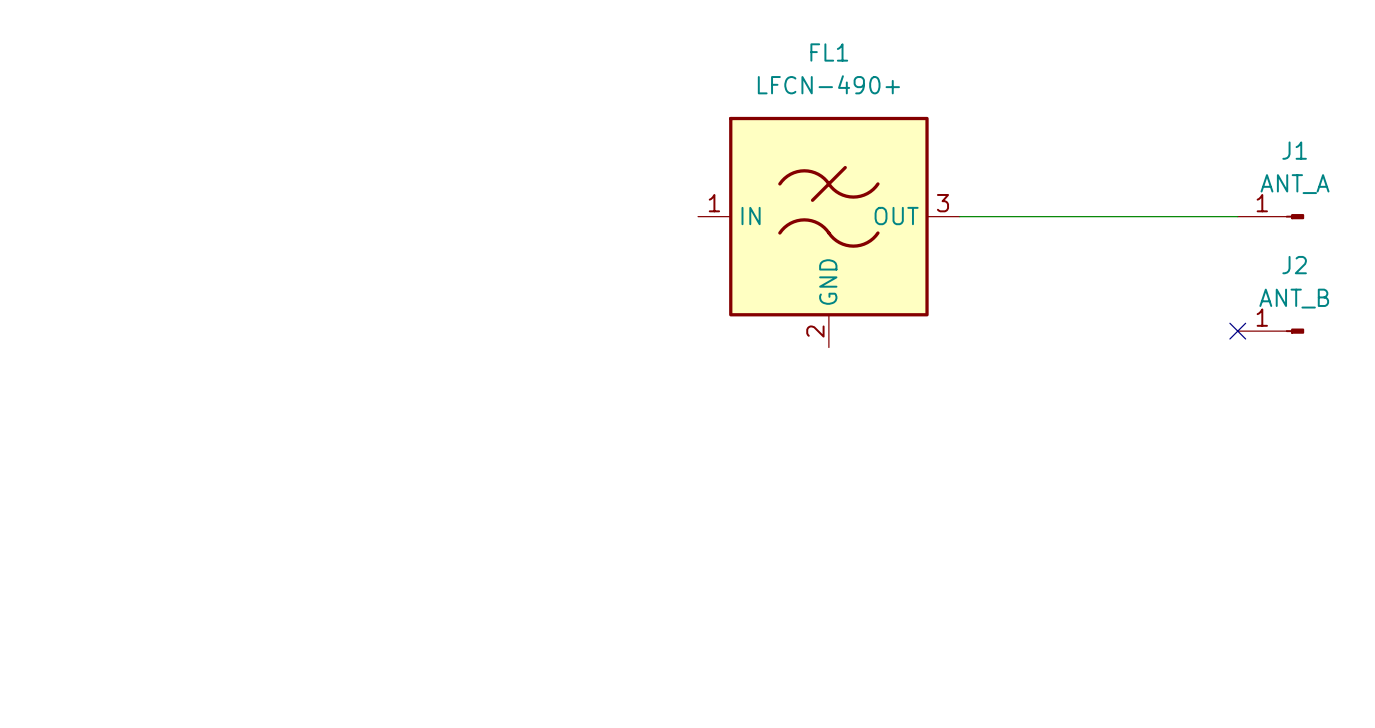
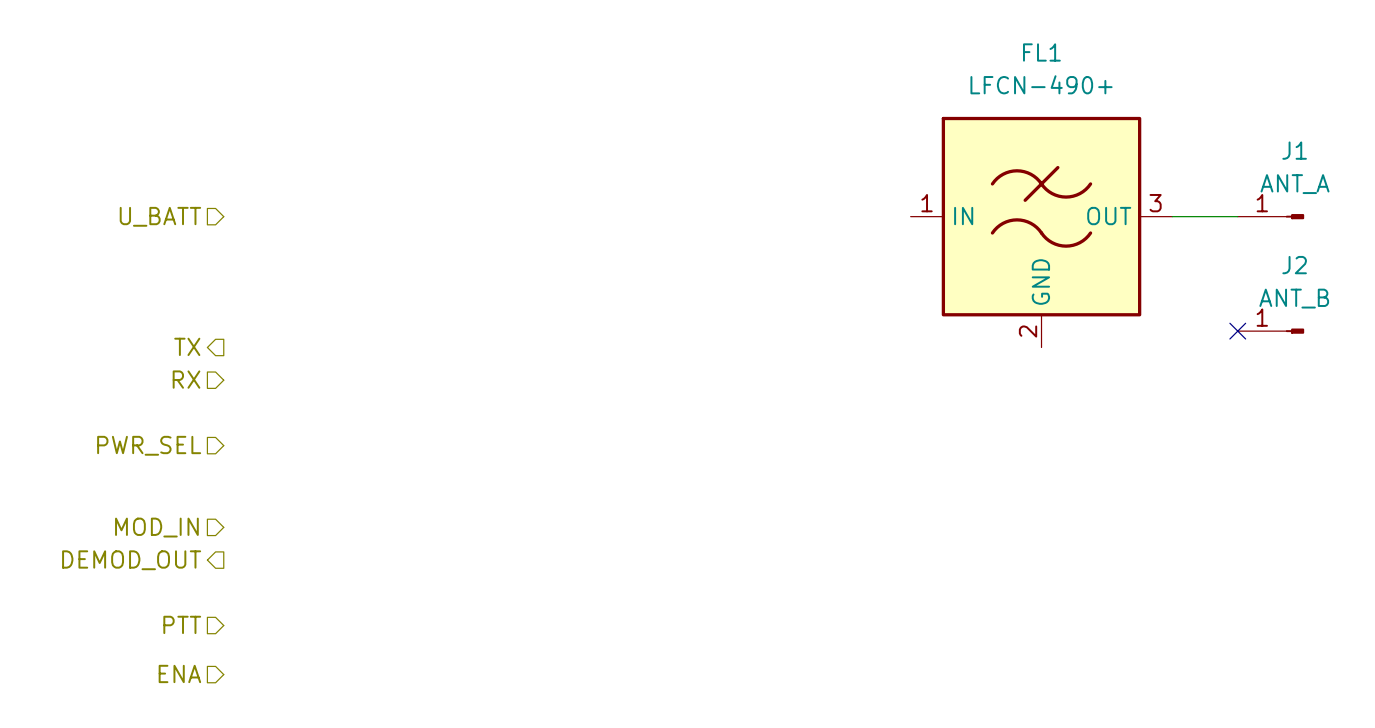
hierarchical label: none -> U_BATT (160, 216)
FL1 position: (828, 232) -> (1041, 232)
hierarchical label: none -> TX (187, 346)
hierarchical label: none -> RX (186, 379)
hierarchical label: none -> PWR_SEL (149, 445)
hierarchical label: none -> MOD_IN (156, 527)
hierarchical label: none -> DEMOD_OUT (131, 560)
hierarchical label: none -> PTT (182, 624)
hierarchical label: none -> ENA (179, 673)

